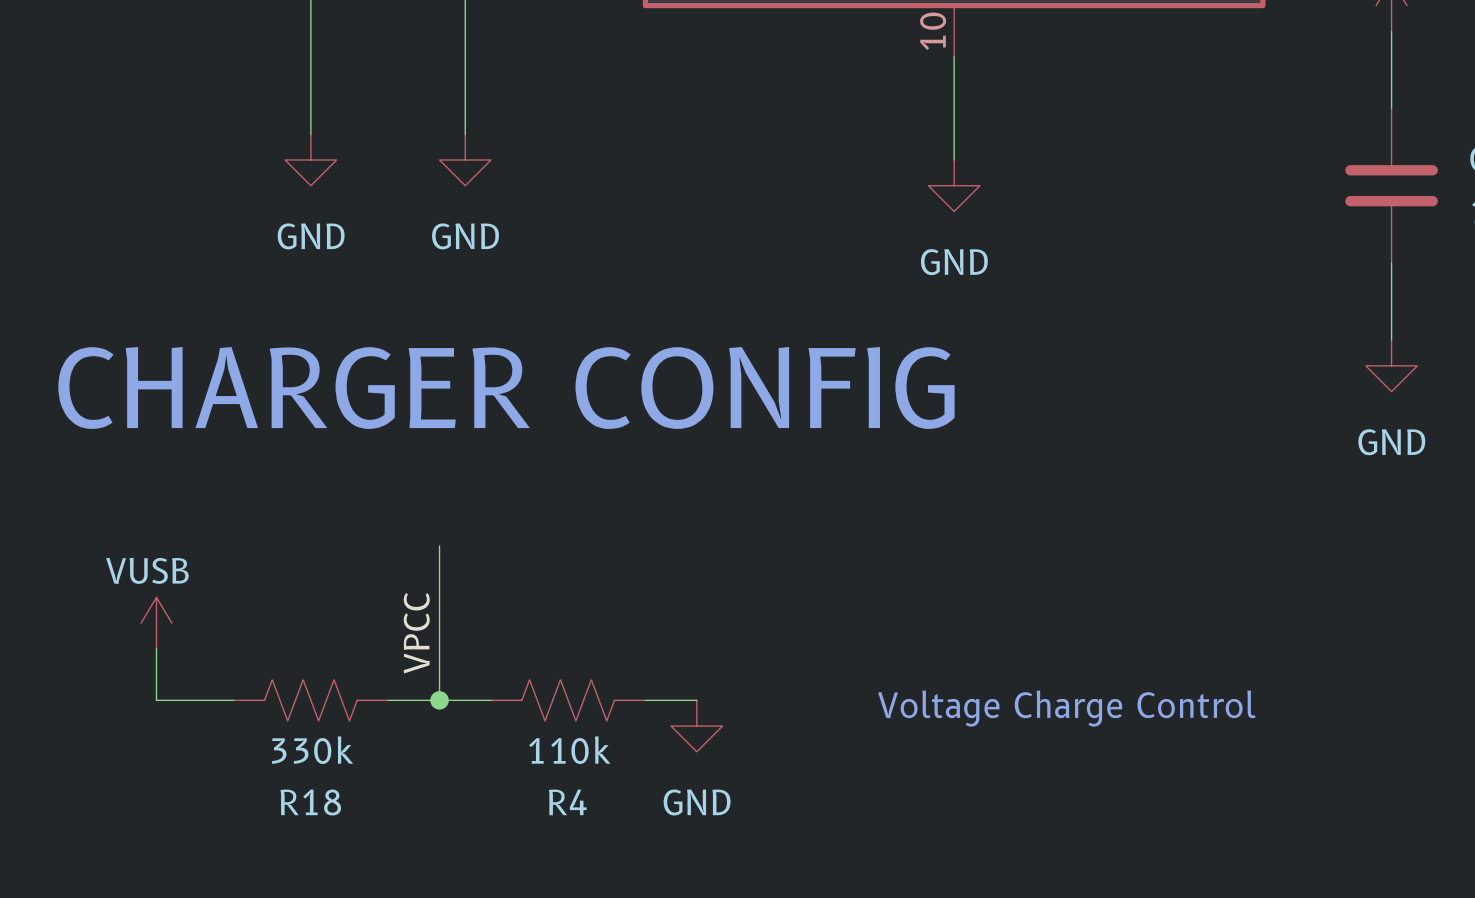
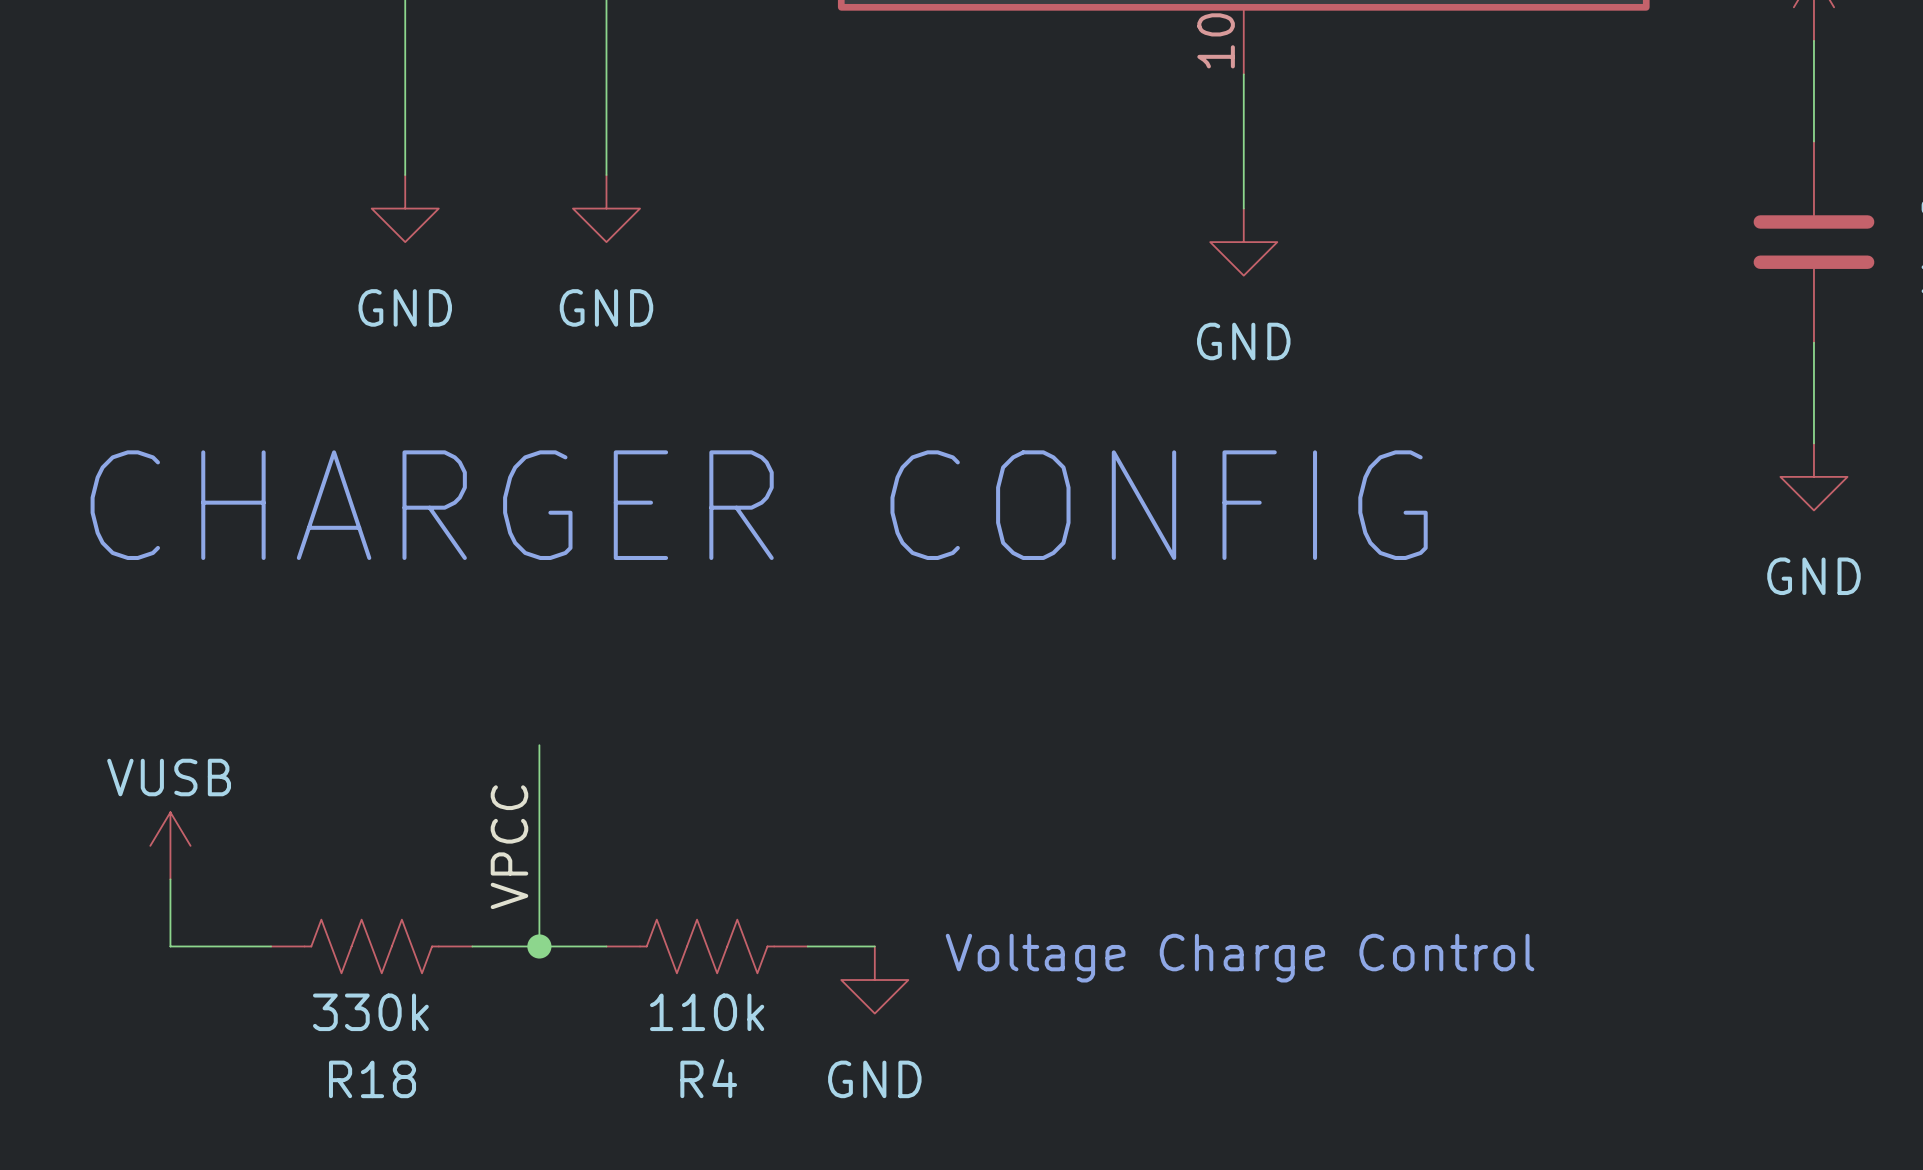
wire: (439, 545) (439, 700) -> (539, 745) (539, 946)
power symbol position: VUSB (156, 623) -> VUSB (170, 845)
label position: VPCC (416, 633) -> VPCC (509, 847)
wire: (156, 648) (156, 700) (233, 700) -> (170, 879) (170, 946) (271, 946)
R18 position: (310, 700) -> (371, 946)
wire: (388, 700) (490, 700) -> (472, 946) (606, 946)
junction position: (439, 700) -> (539, 946)
R4 position: (568, 700) -> (707, 946)
wire: (645, 700) (696, 700) -> (807, 946) (874, 946)
text position: Voltage Charge Control (1066, 708) -> Voltage Charge Control (1240, 958)
power symbol position: GND (696, 726) -> GND (874, 980)

